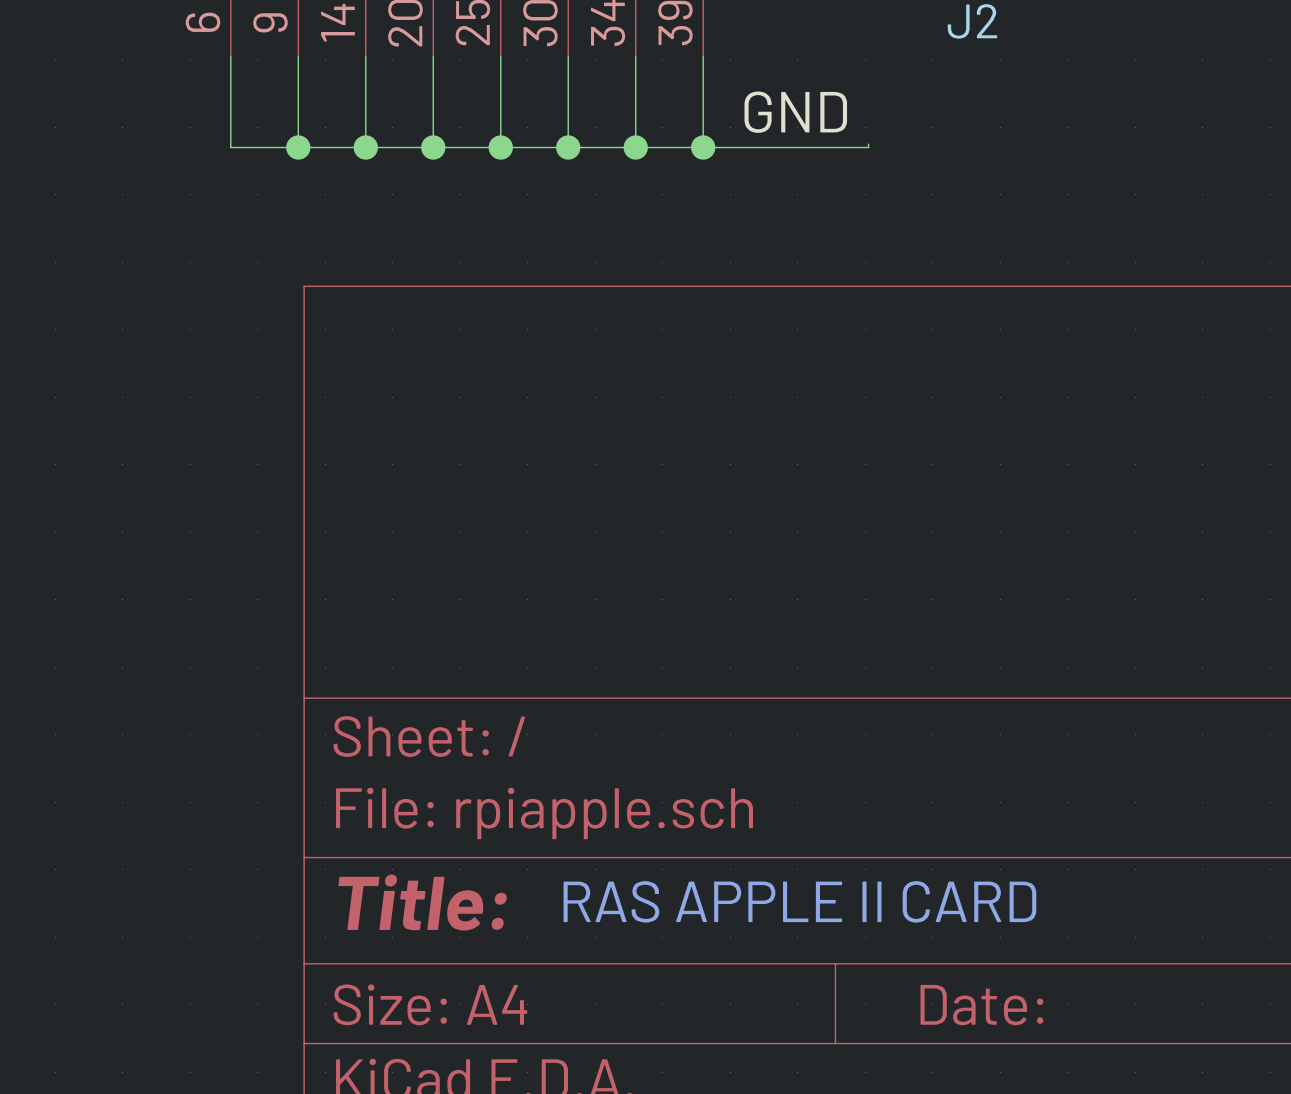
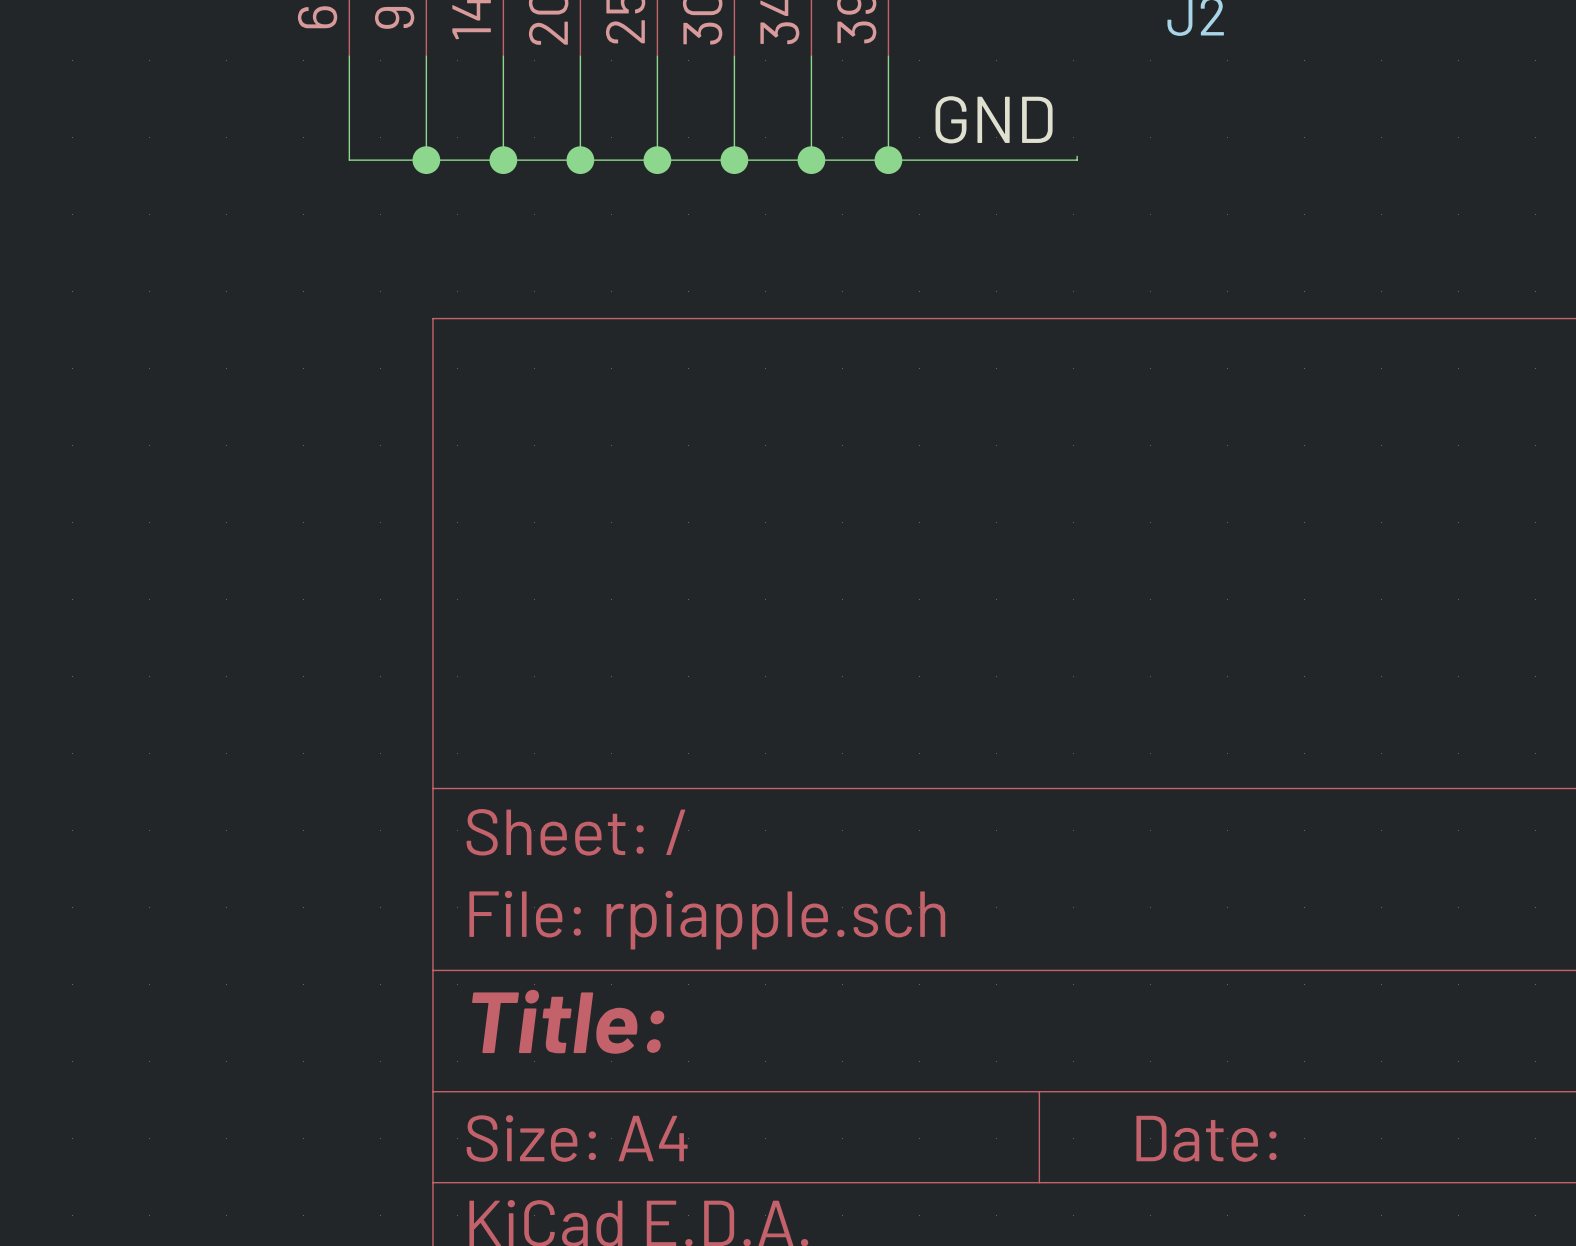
text: RAS APPLE II CARD (799, 901) -> none

